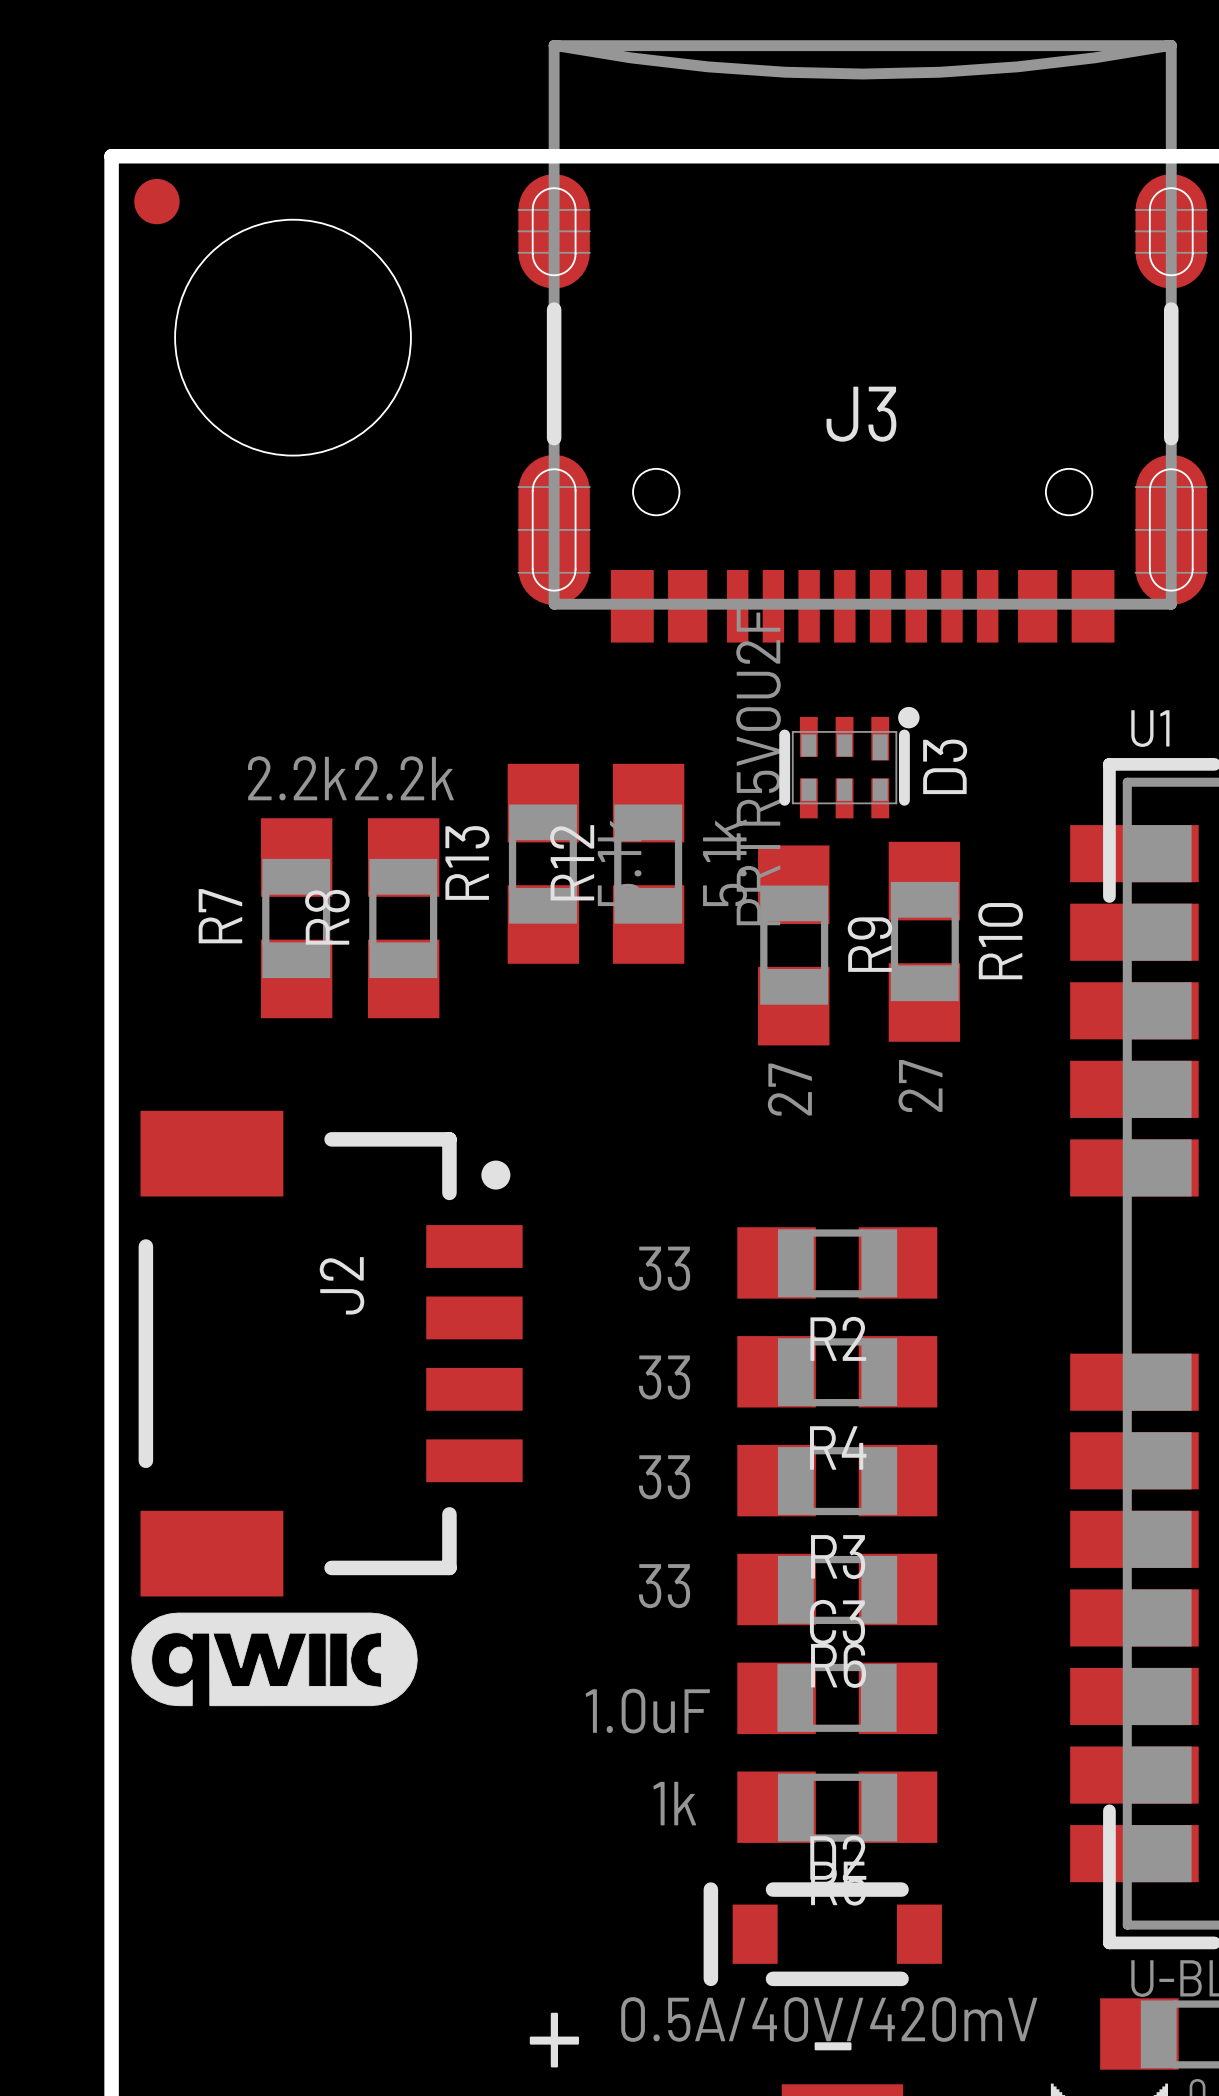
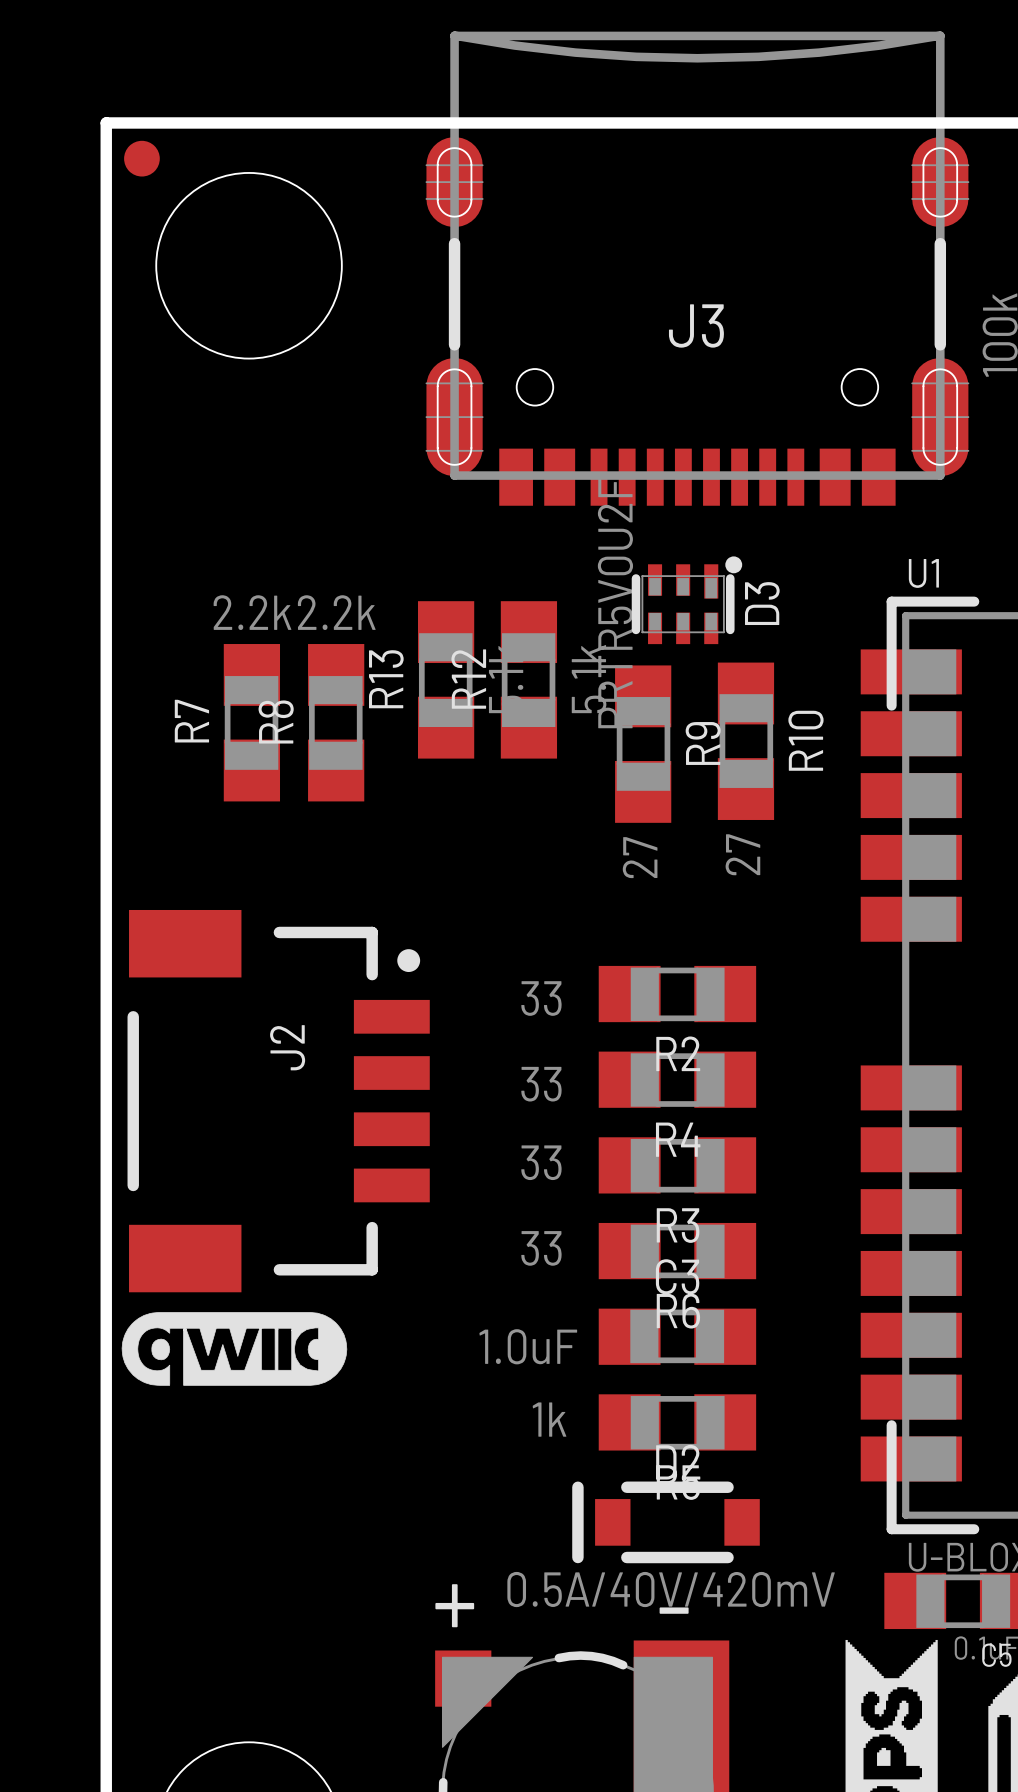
J2 position: (330, 1353) -> (278, 1101)
drawing position: (274, 1659) -> (234, 1348)

